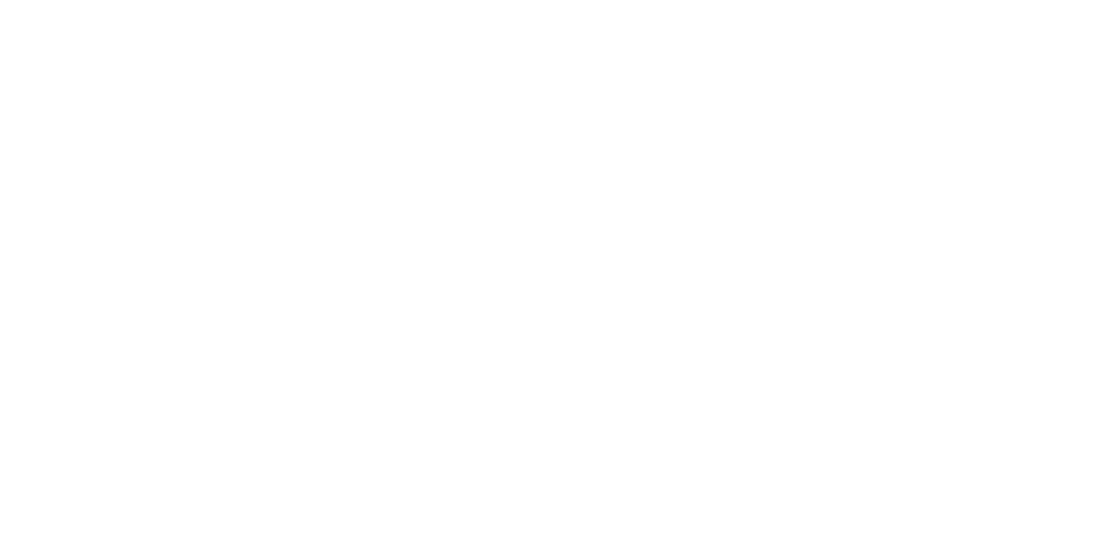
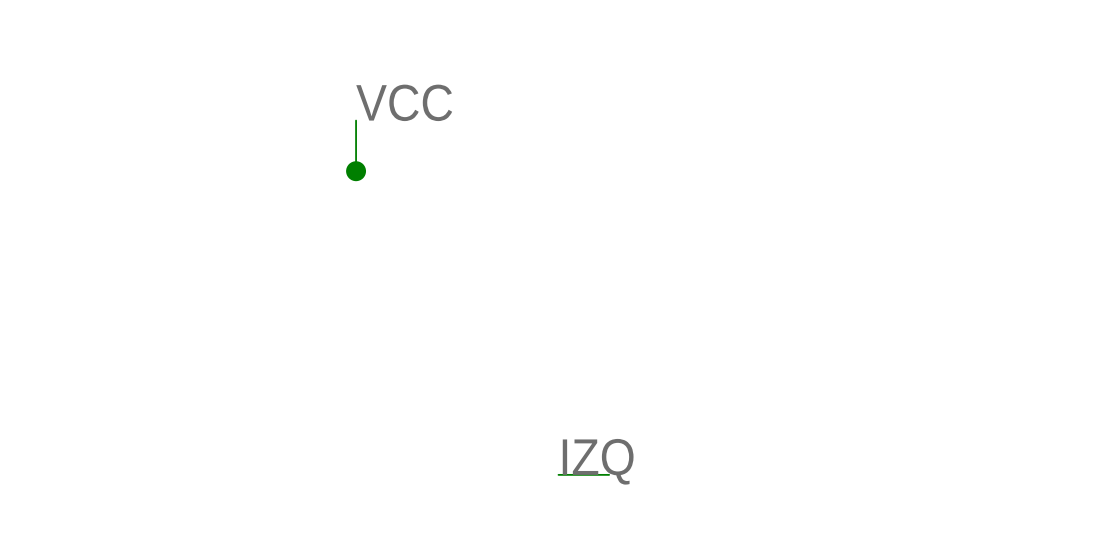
label: none -> VCC (404, 102)
wire: none -> (356, 120) (356, 171)
junction: none -> (356, 171)
label: none -> IZQ (598, 461)
wire: none -> (558, 474) (609, 474)

